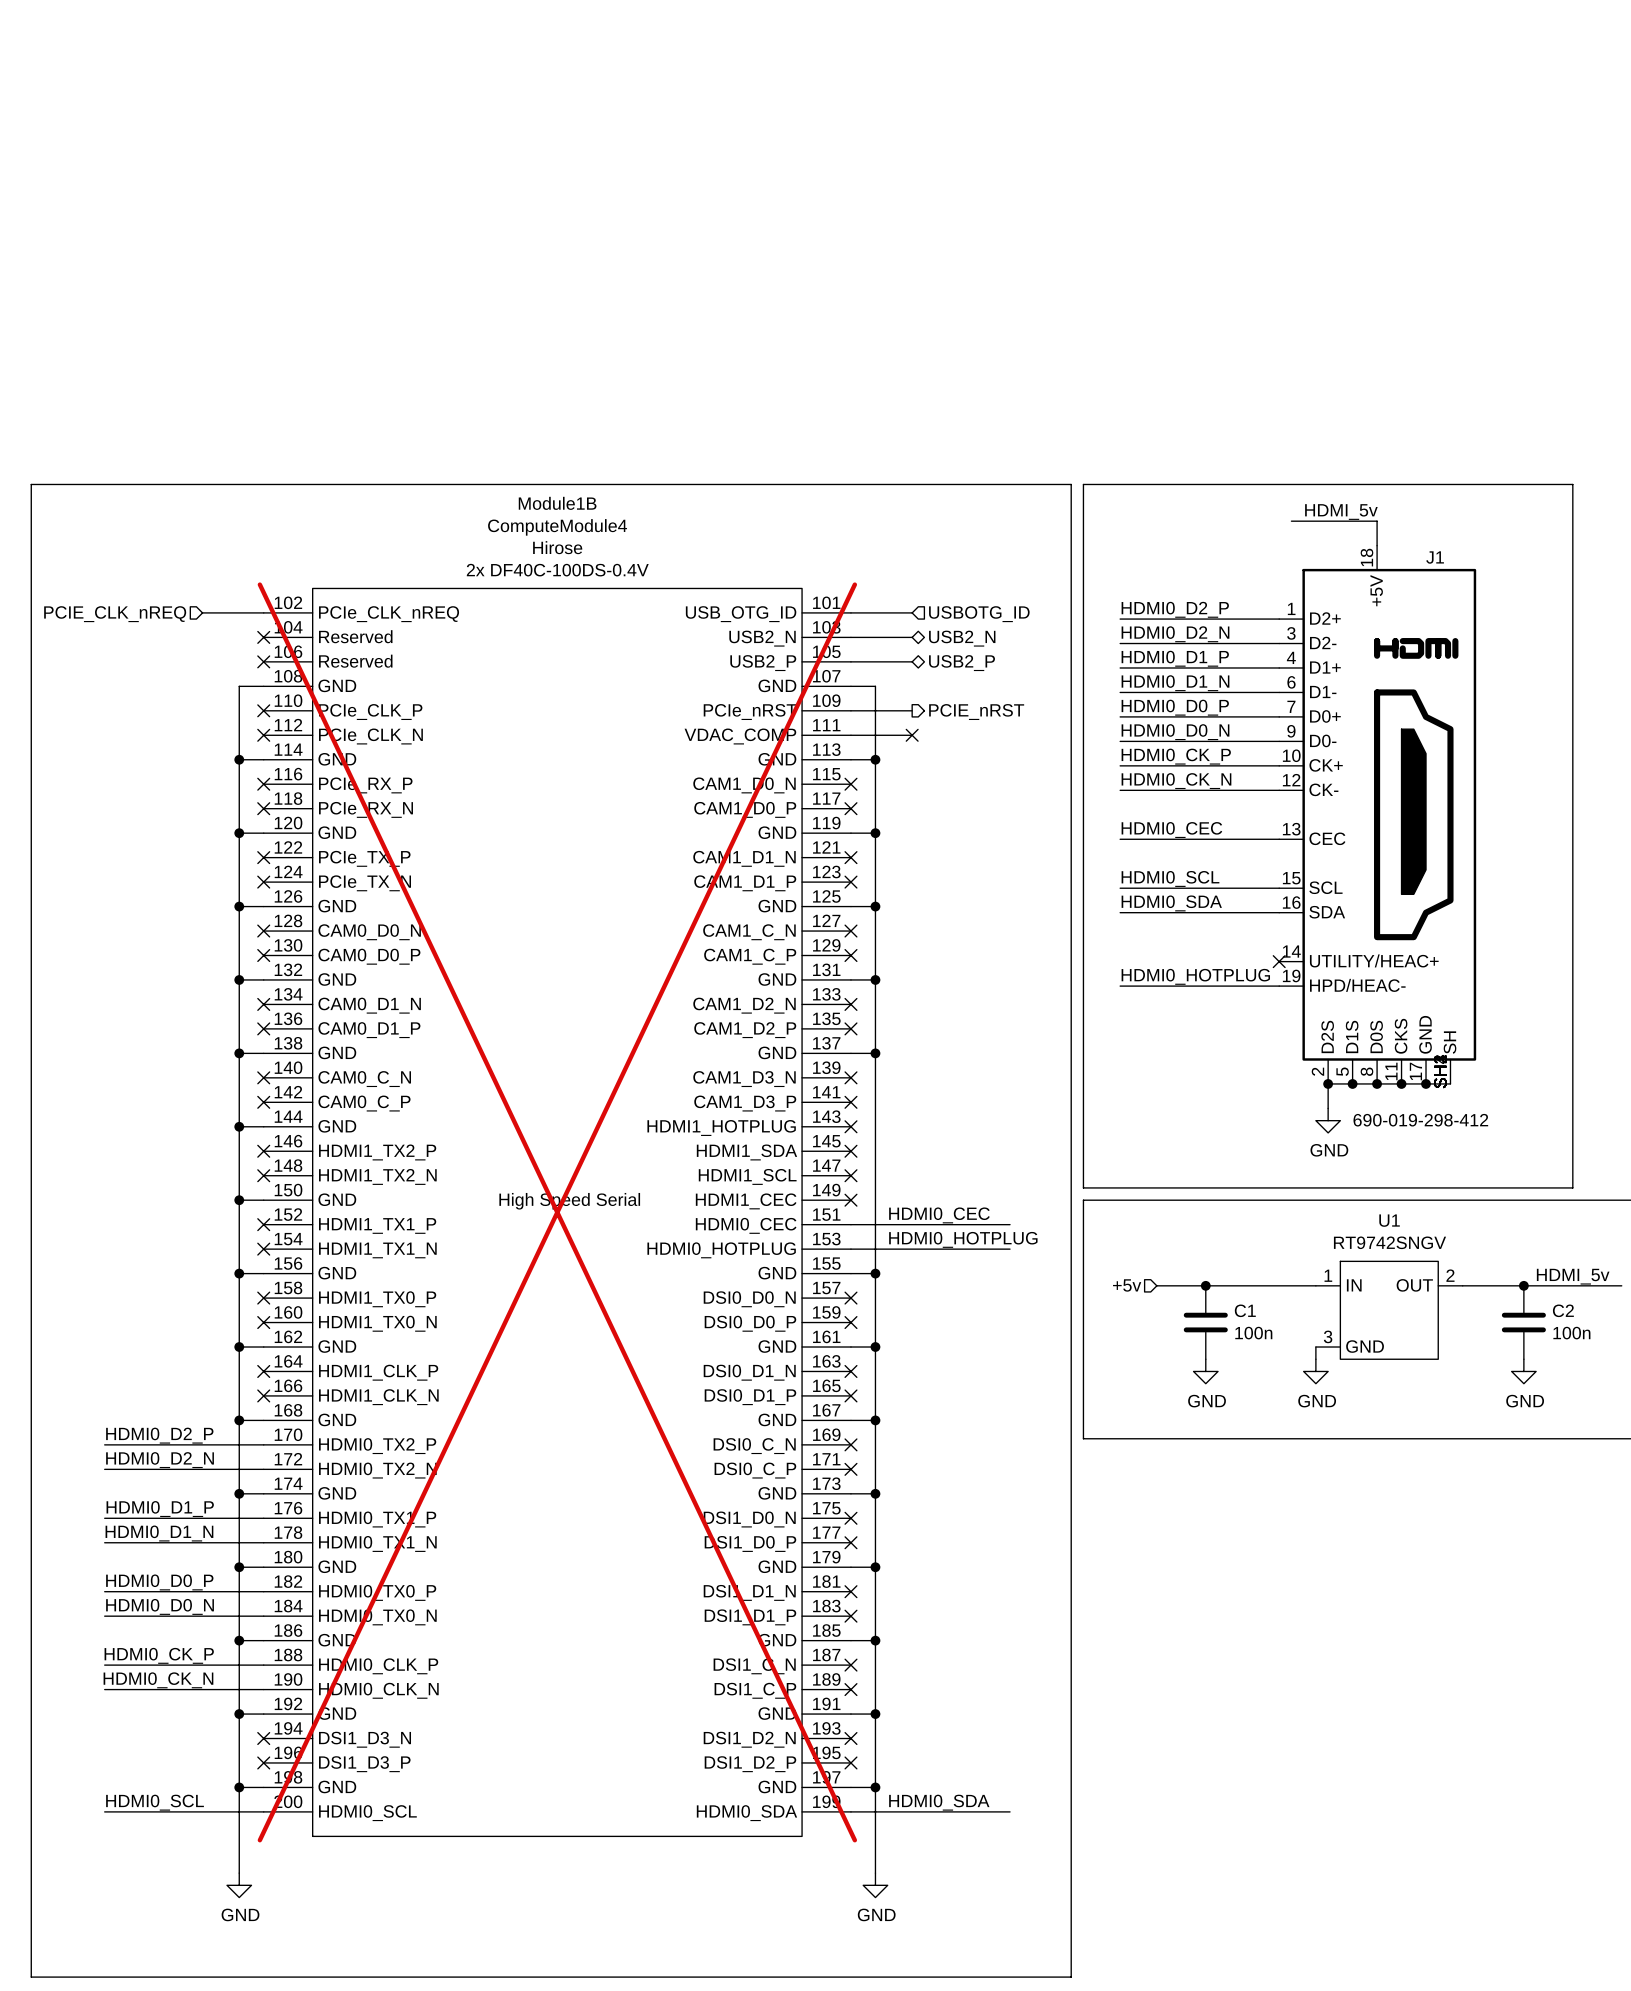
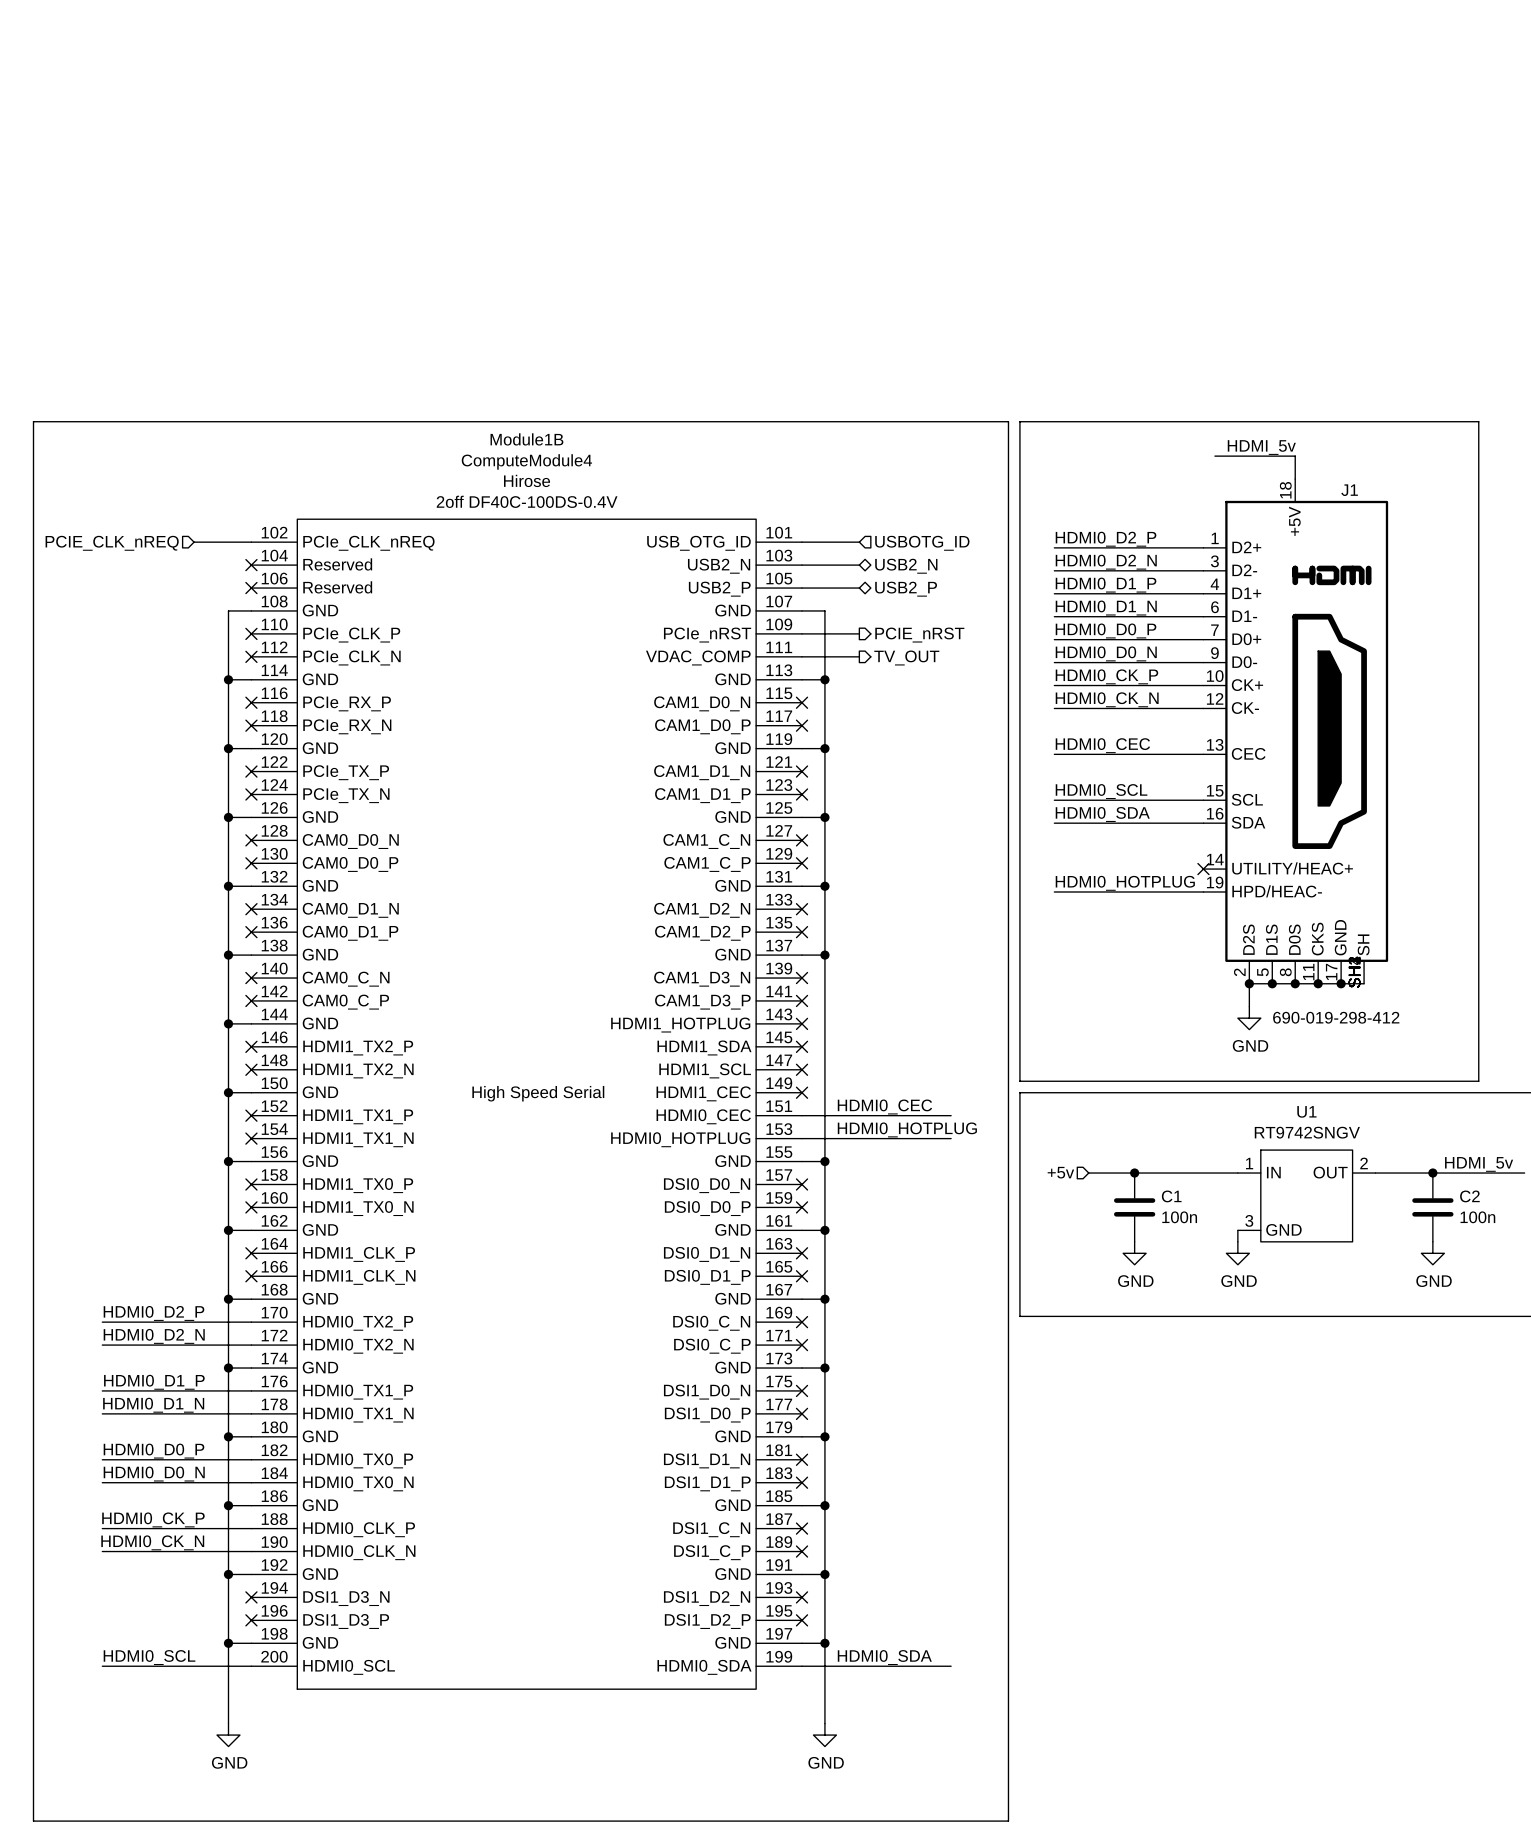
Module1B text: 2x DF40C-100DS-0.4V (557, 570) -> 2off DF40C-100DS-0.4V (527, 501)
no-connect mark: (912, 735) -> none
hierarchical label: none -> TV_OUT (906, 657)
Module1B do-not-place cross: (557, 1212) -> none

